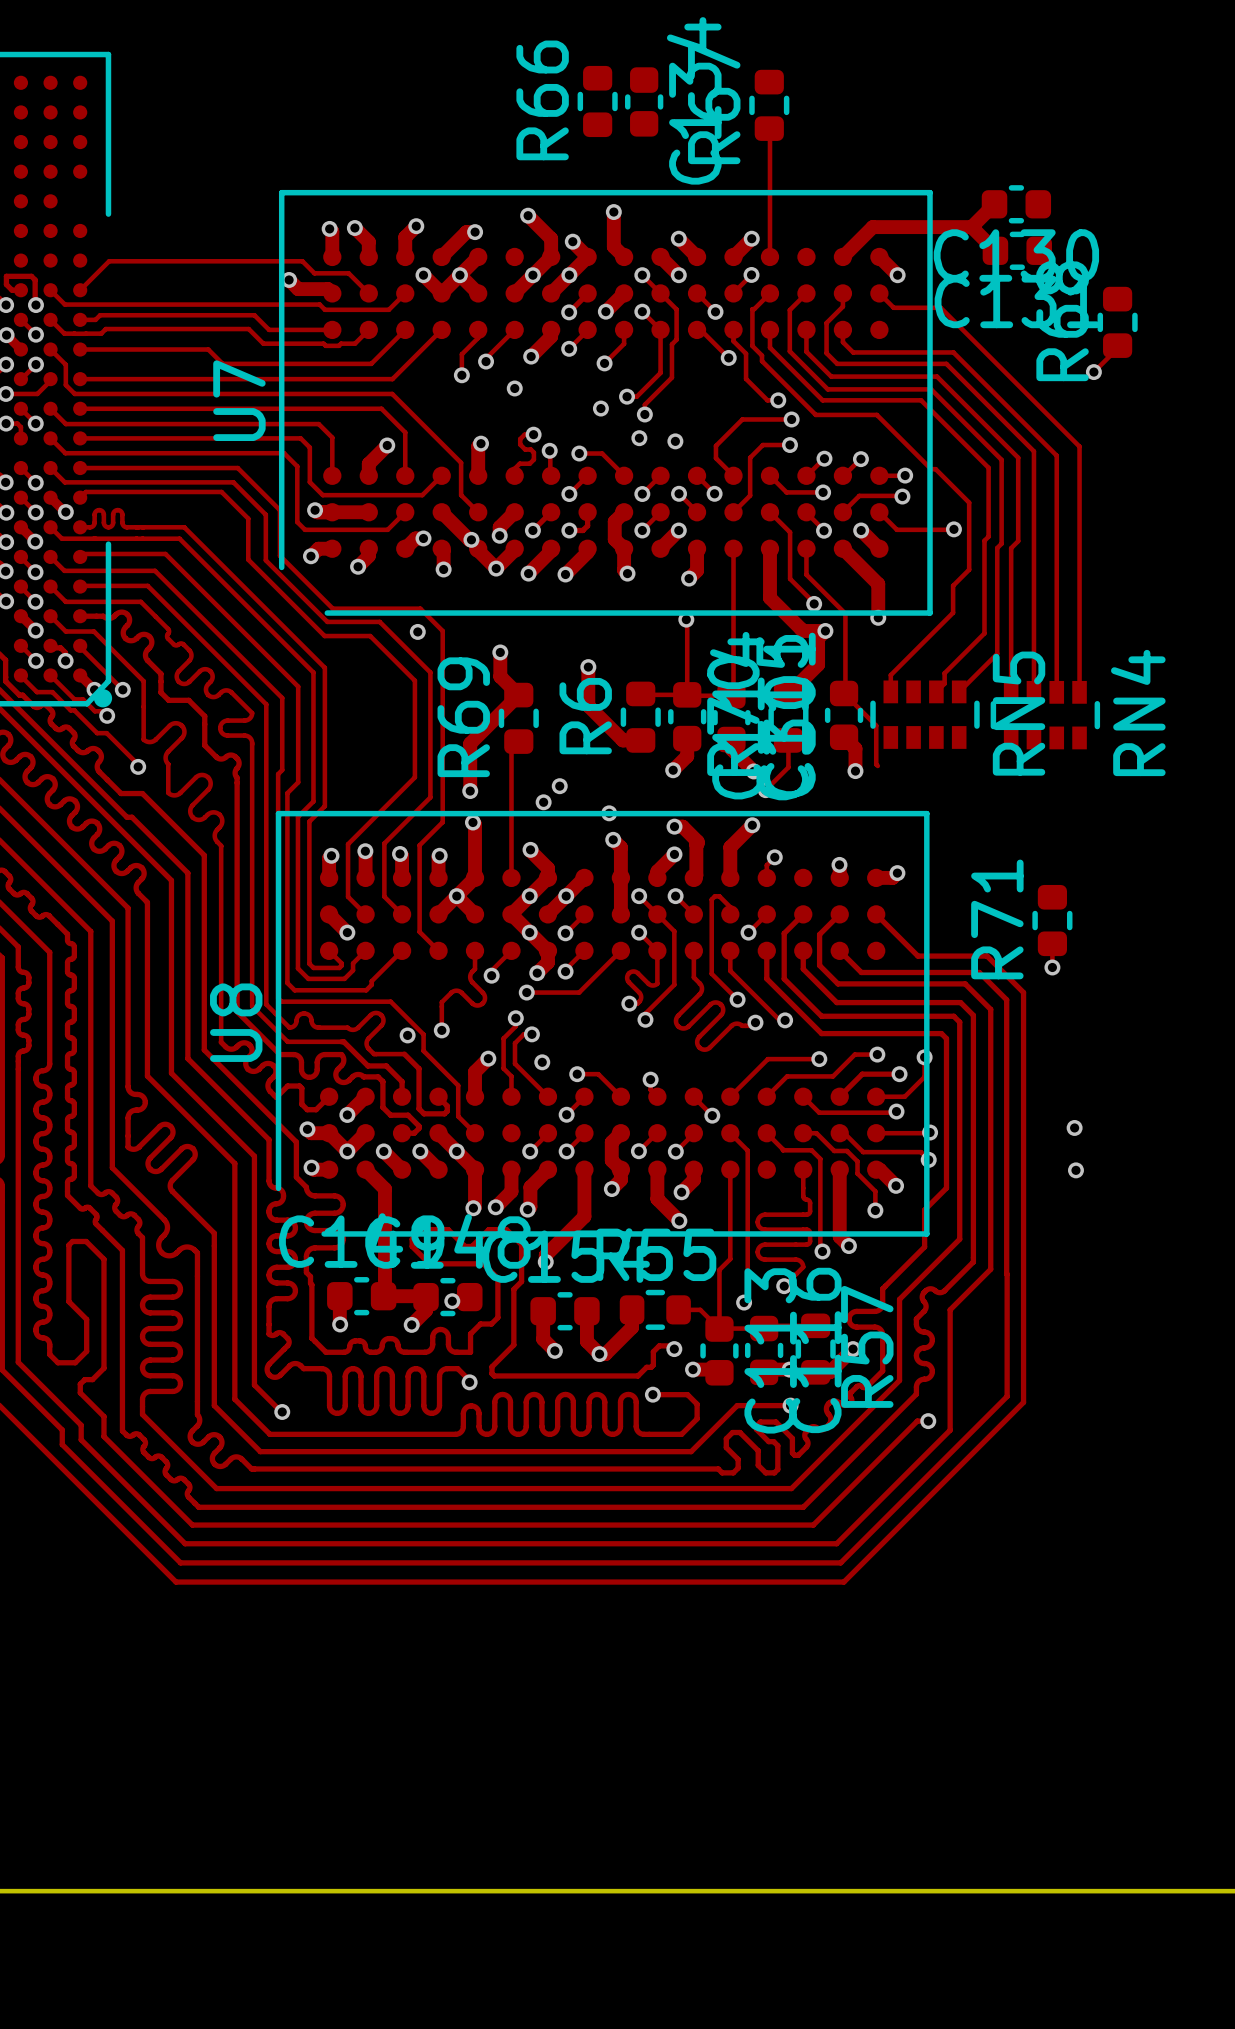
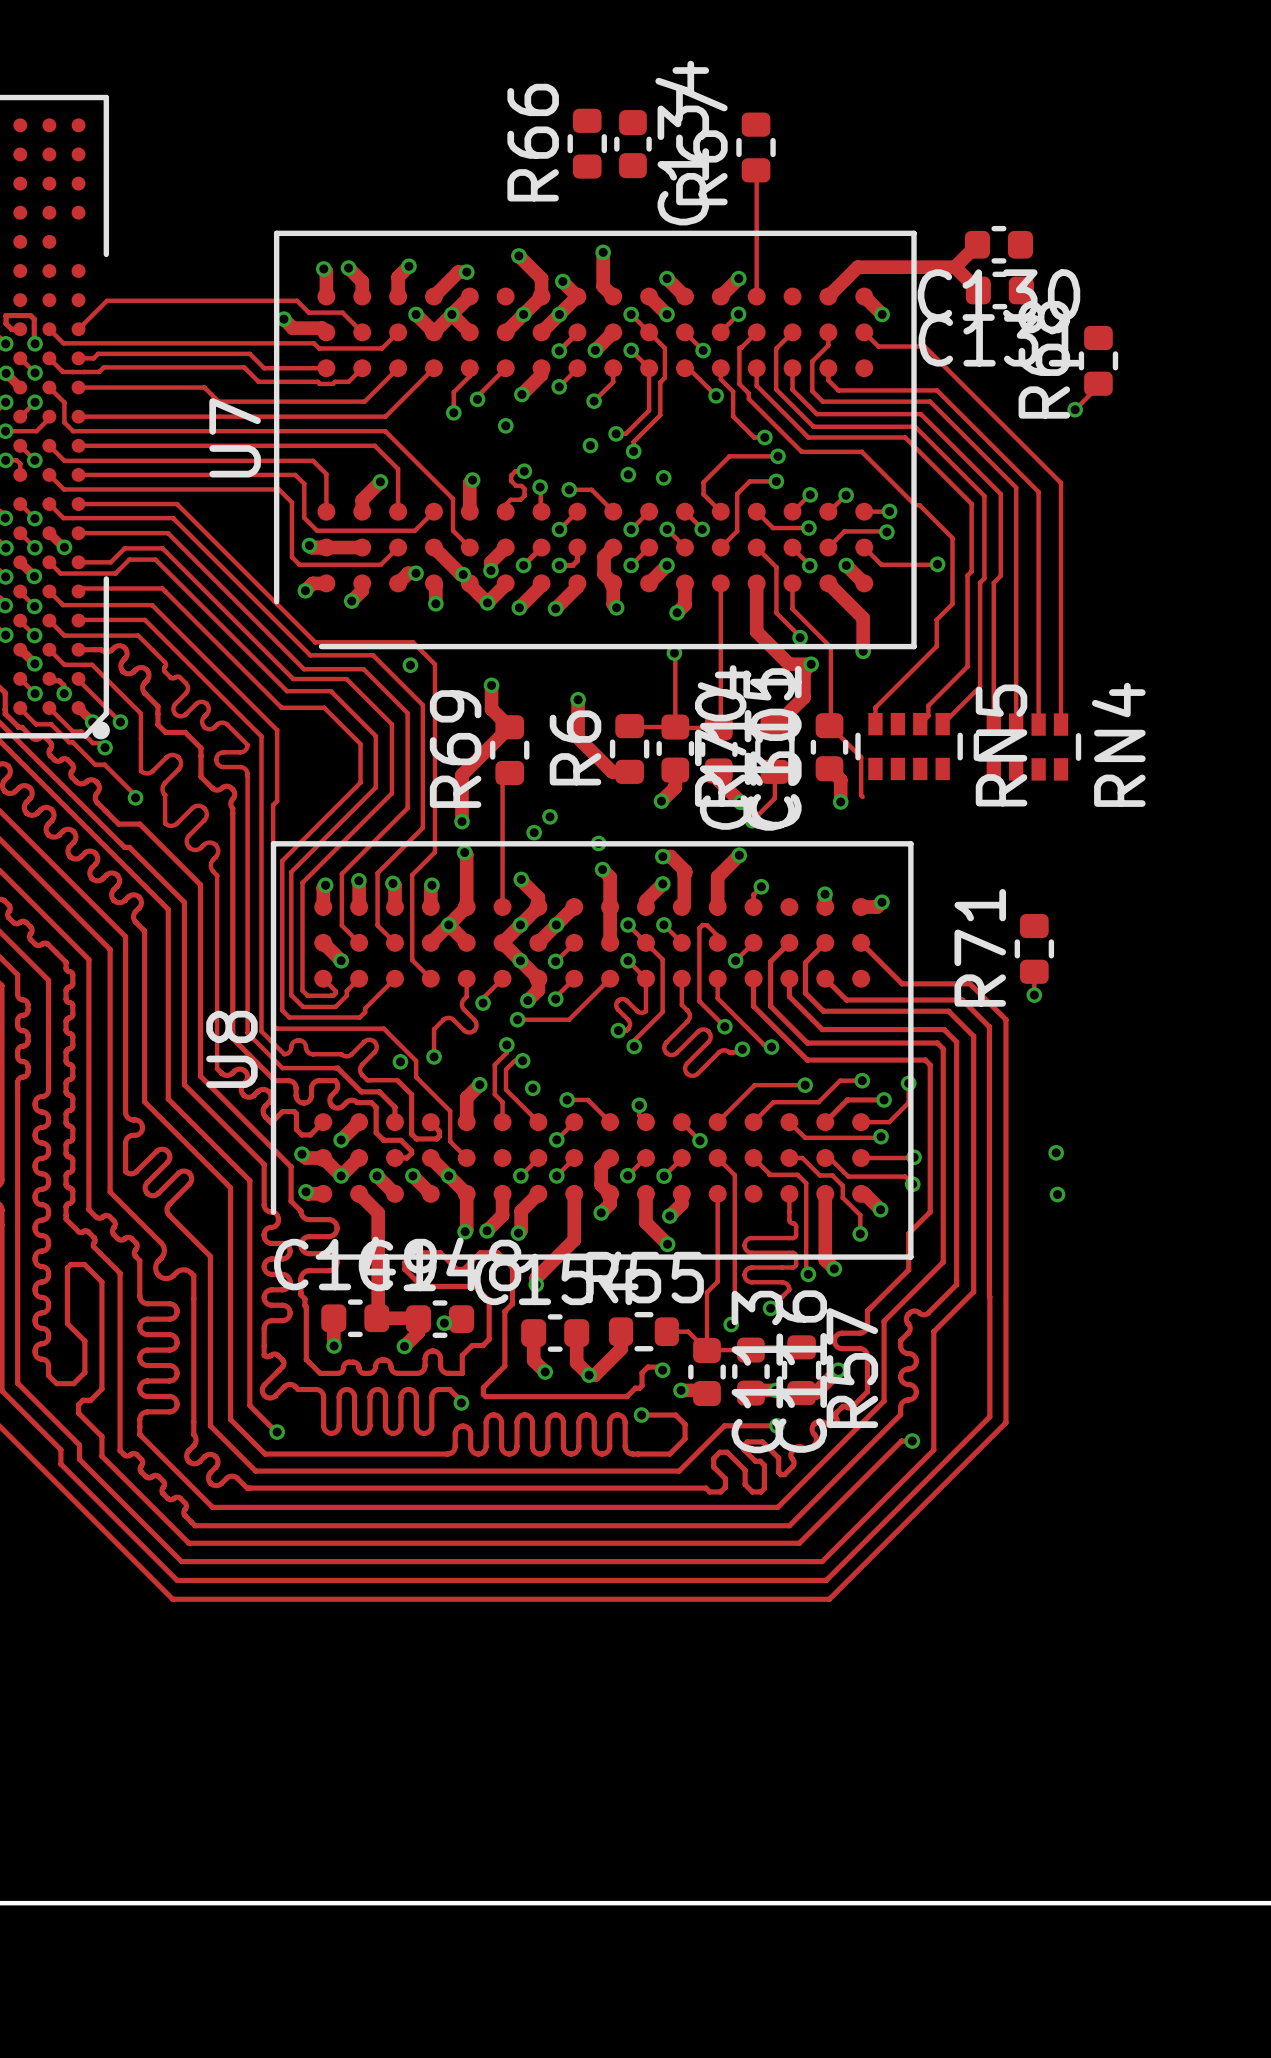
track: (180, 468) (237, 468) (279, 510) (279, 555) (332, 608) -> (177, 504) (315, 642) (326, 642)
track: (176, 482) (233, 482) (265, 514) (265, 560) (327, 621) -> (173, 518) (310, 655) (321, 655)
track: (80, 497) (85, 491) (221, 491) (248, 518) (248, 559) (324, 636) -> (78, 533) (168, 533) (304, 669) (318, 669)
track: (89, 527) (93, 524) (94, 512) (99, 510) (103, 512) (104, 525) (110, 526) (113, 523) (113, 512) (117, 510) (122, 512) (122, 523) (125, 527) (184, 527) (324, 667) (324, 806) (309, 821) (309, 963) (313, 967) -> (88, 562) (110, 562) (124, 548) (162, 548) (293, 679) (346, 679) (391, 724) (391, 793) (302, 882) (302, 990) (307, 995)
track: (117, 538) (179, 538) (313, 672) (313, 801) (297, 816) (297, 968) (308, 978) (344, 978) (353, 968) -> (115, 573) (129, 559) (155, 559) (287, 691) (330, 691) (375, 736) (375, 787) (291, 872) (291, 995) (303, 1006) (335, 1006) (346, 995)
track: (286, 675) (298, 686) (298, 782) (287, 793) (287, 831) -> (281, 707) (324, 707) (360, 744) (360, 782) (282, 860)

